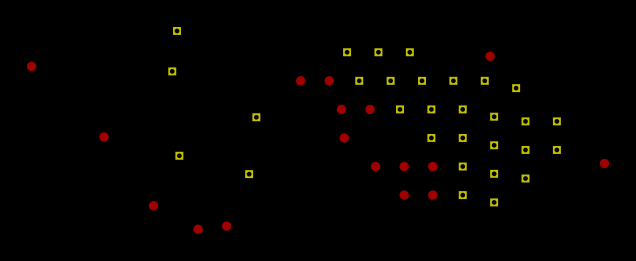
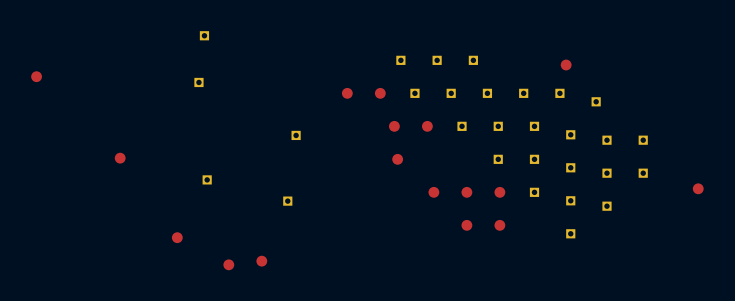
part: (462, 195) -> none

